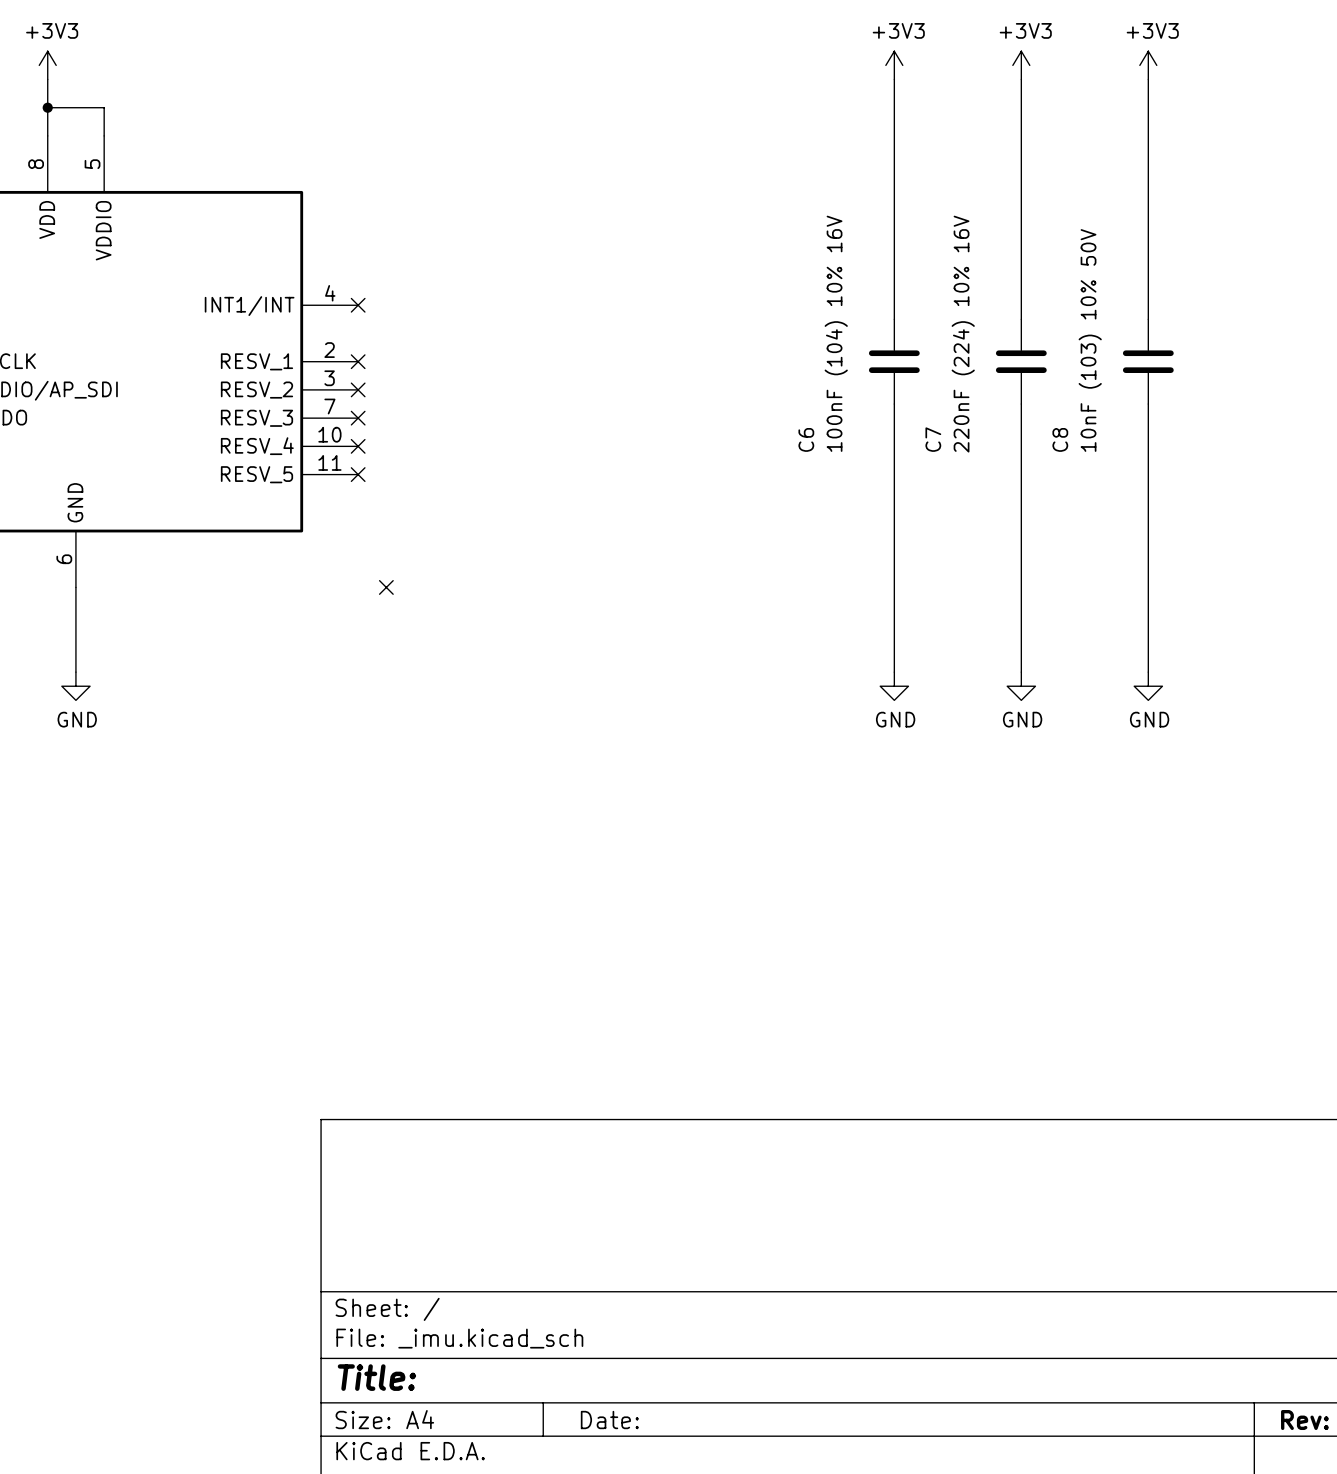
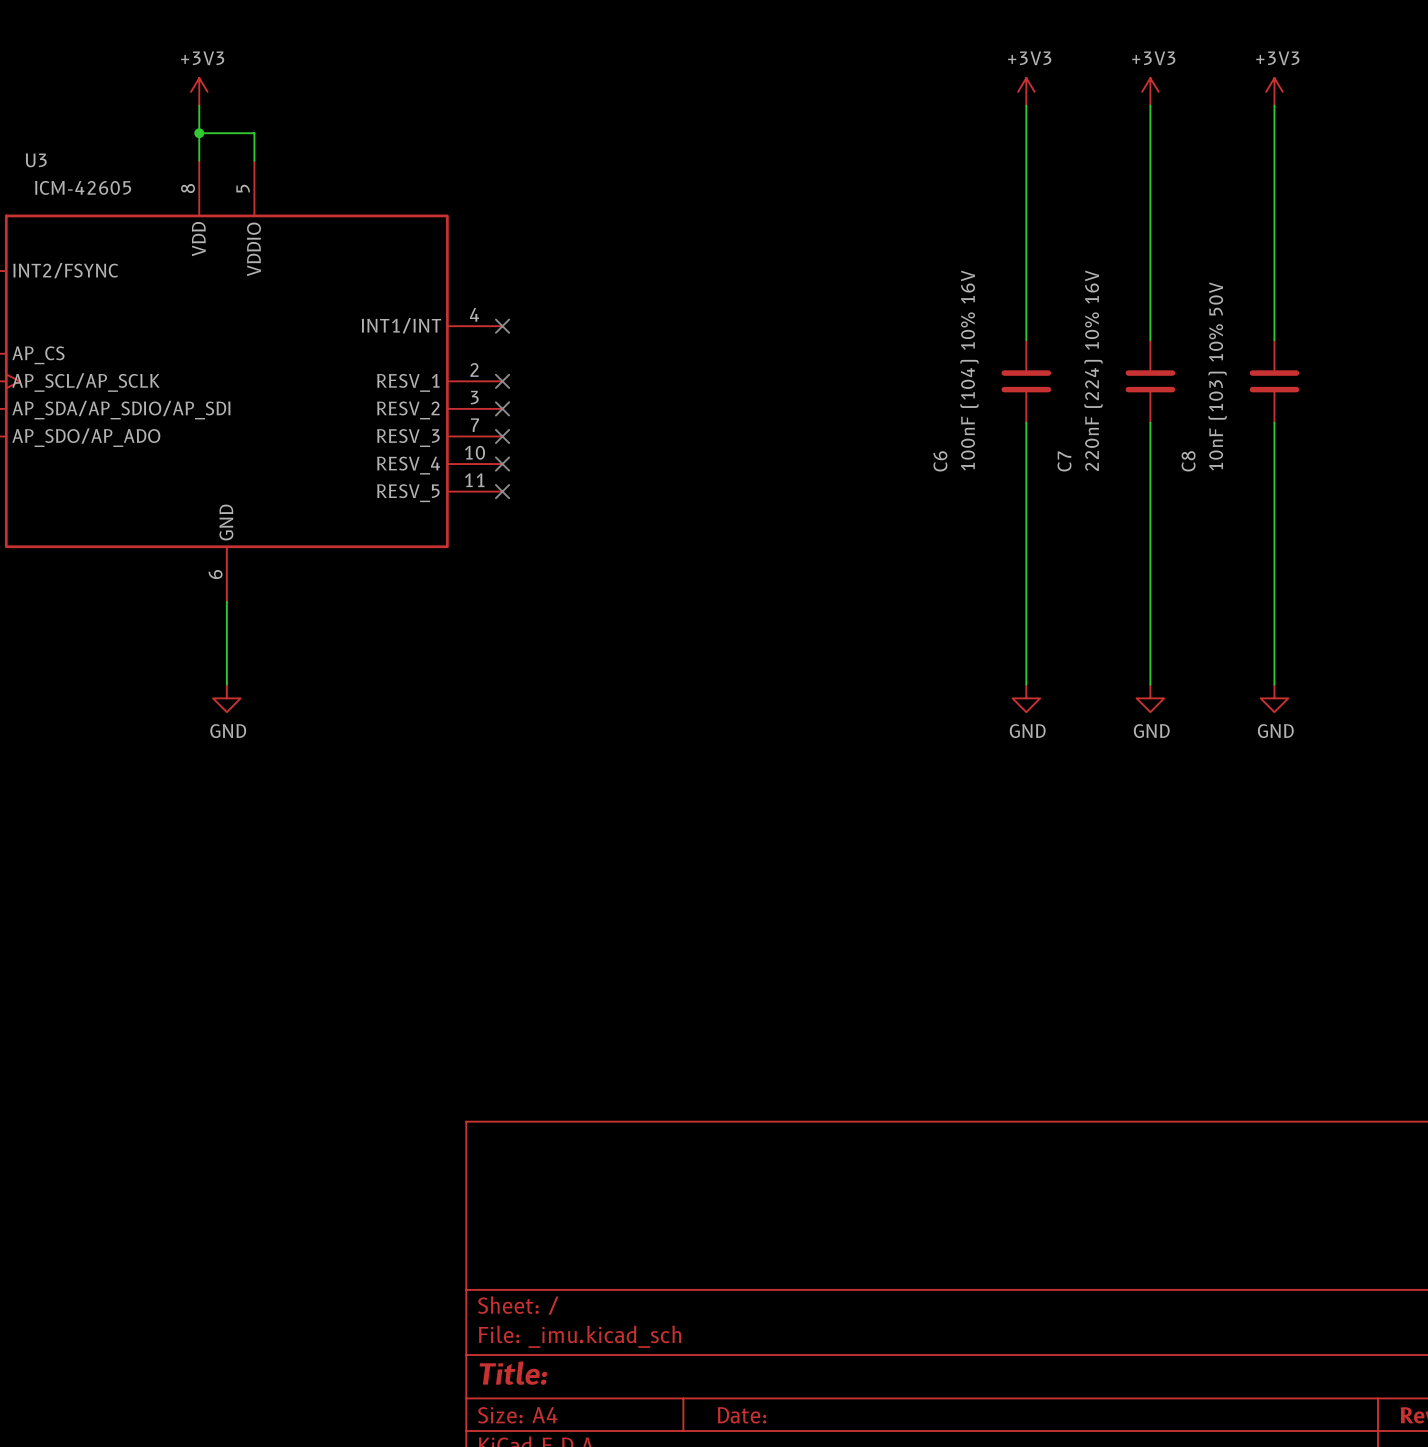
no-connect mark: (386, 587) -> none

